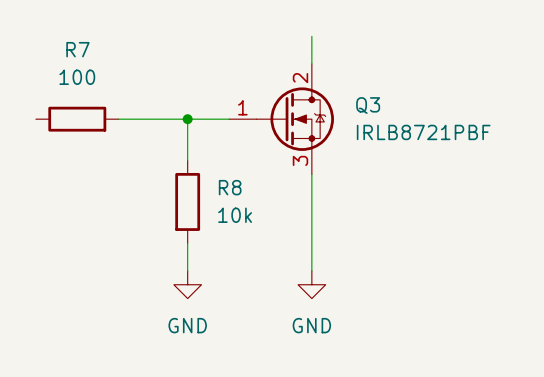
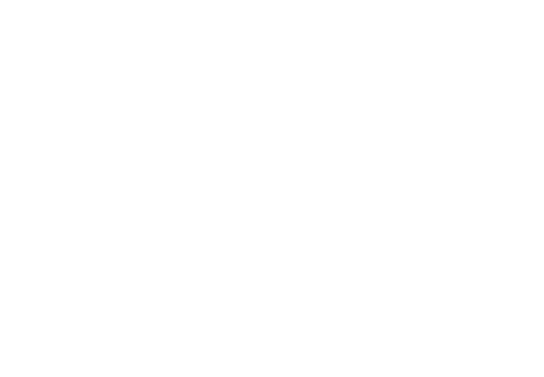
wire: (311, 36) (311, 63) -> none
R7: 100 (77, 119) -> none
wire: (118, 119) (229, 119) -> none
wire: (187, 119) (187, 160) -> none
junction: (187, 119) -> none
Q3: IRLB8721PBF (281, 119) -> none
wire: (311, 174) (311, 270) -> none
R8: 10k (187, 201) -> none
wire: (187, 243) (187, 270) -> none
power symbol: GND (187, 284) -> none
power symbol: GND (311, 284) -> none

